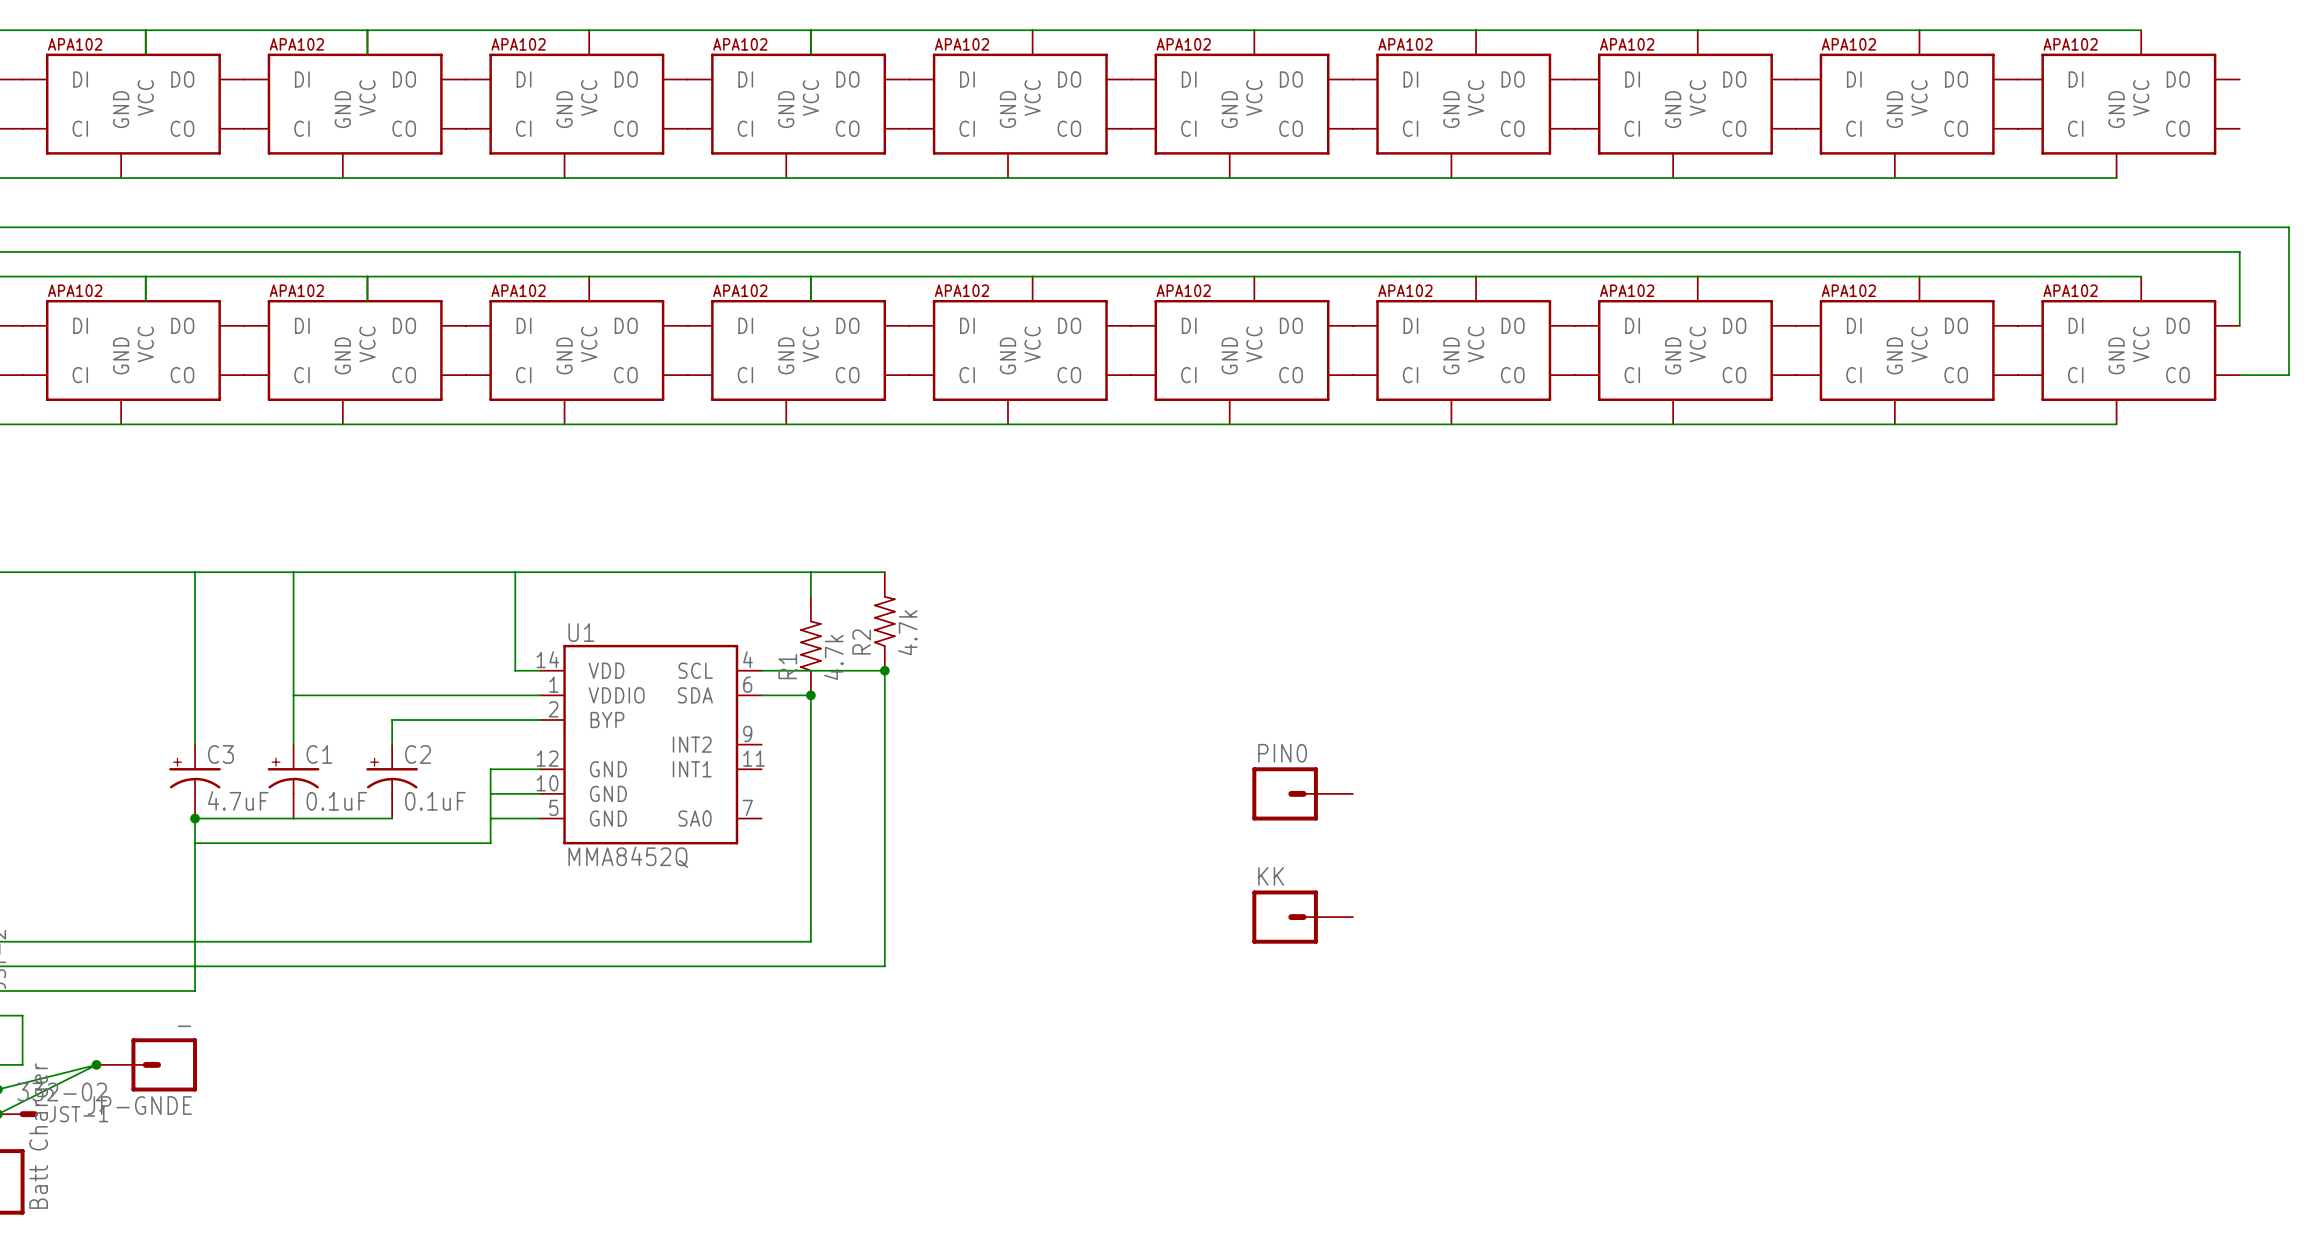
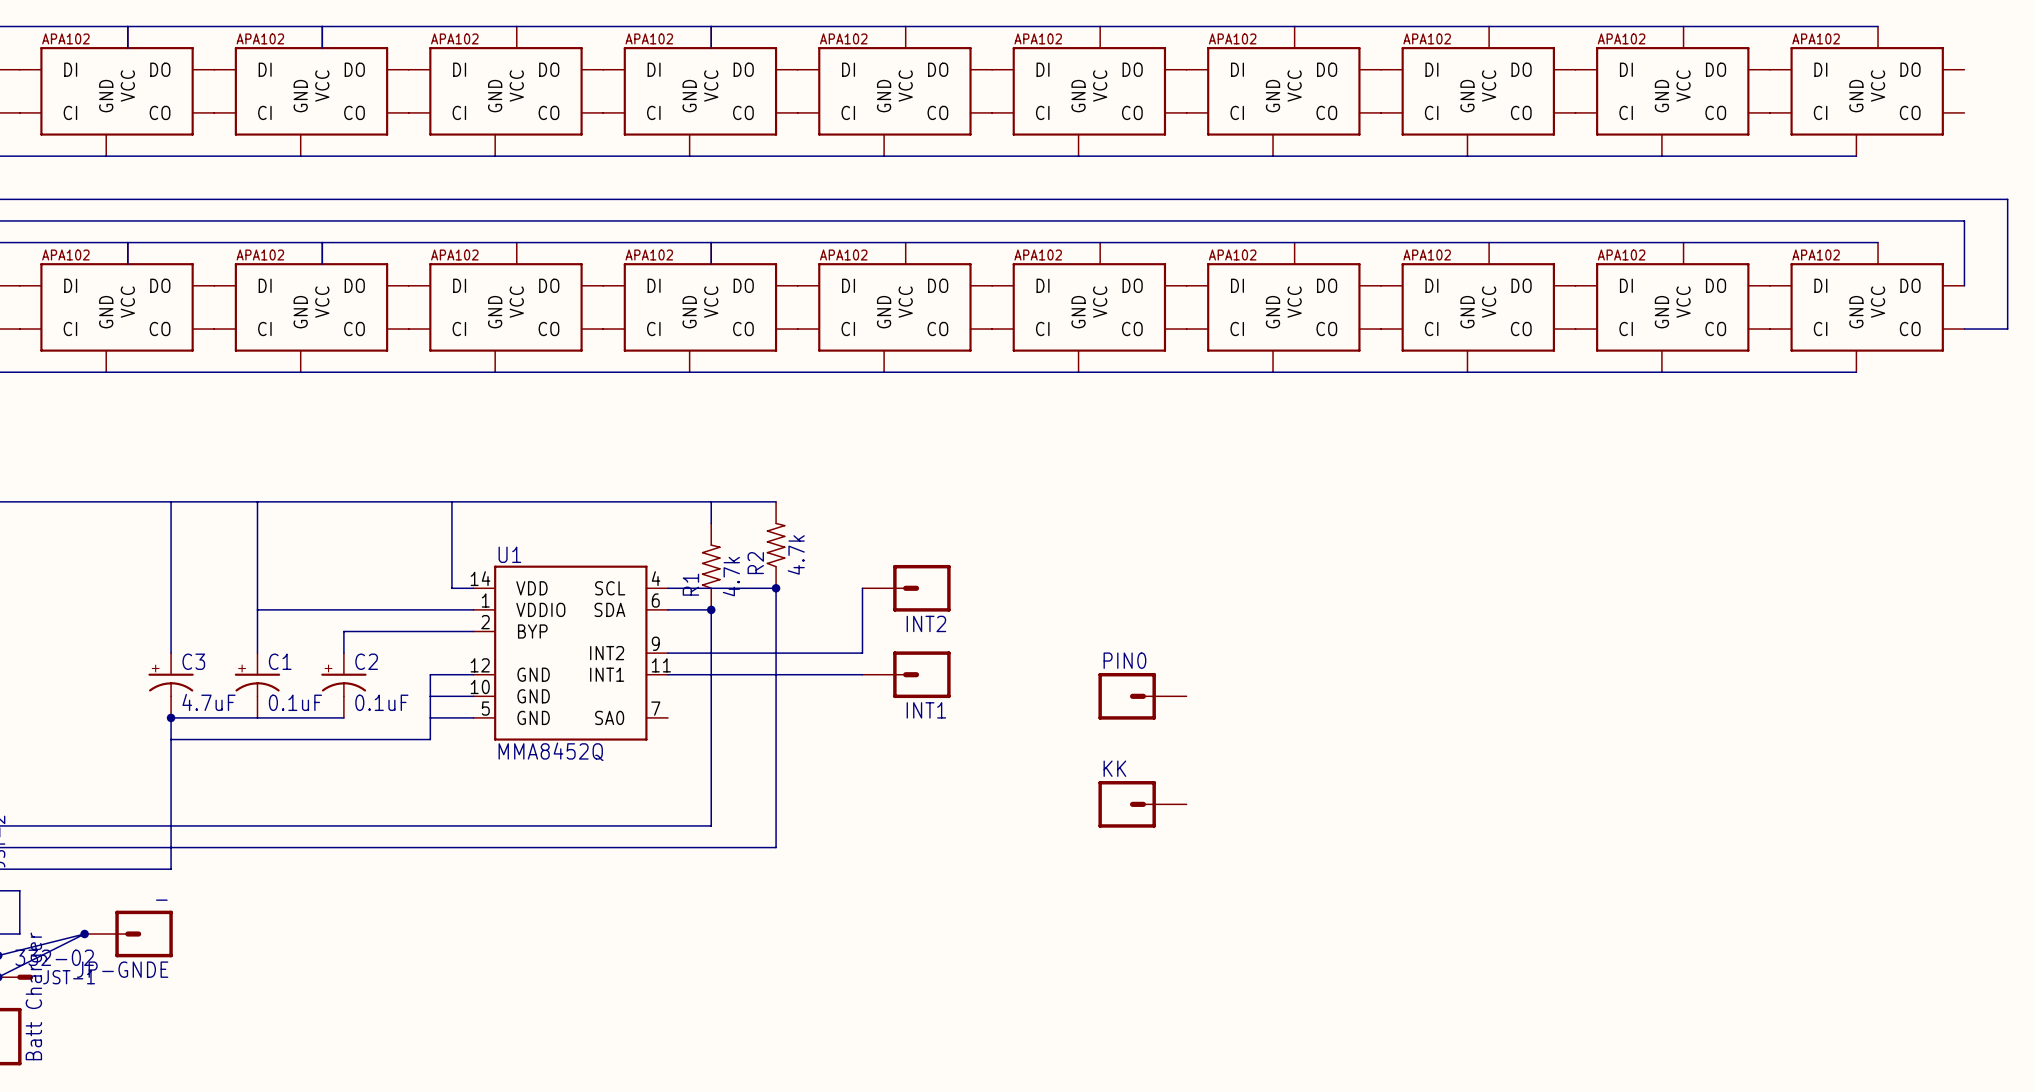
wire: none -> (862, 588) (862, 653) (668, 653)
INT2: none -> (906, 588)
wire: none -> (668, 674) (862, 674)
INT1: none -> (906, 674)

